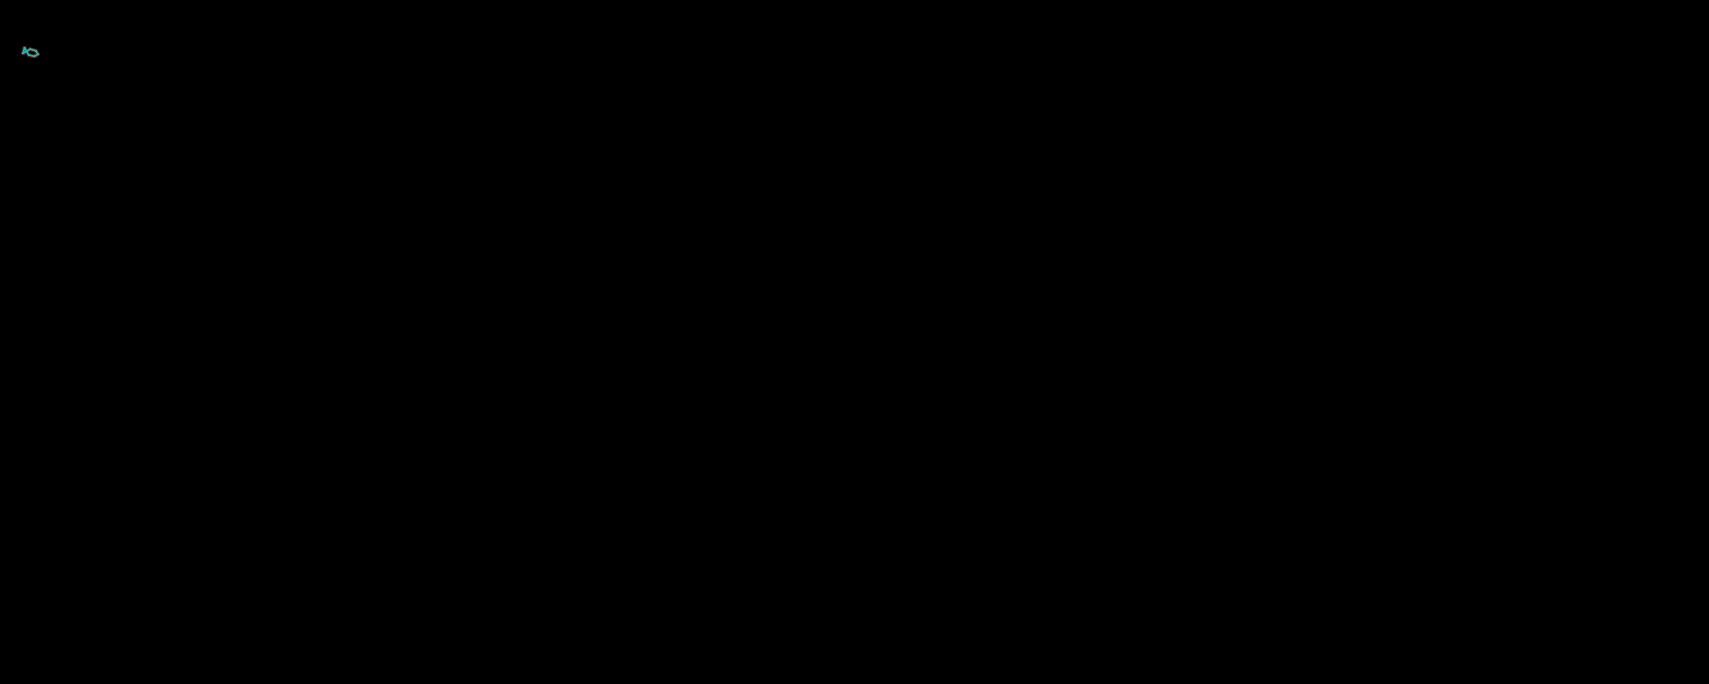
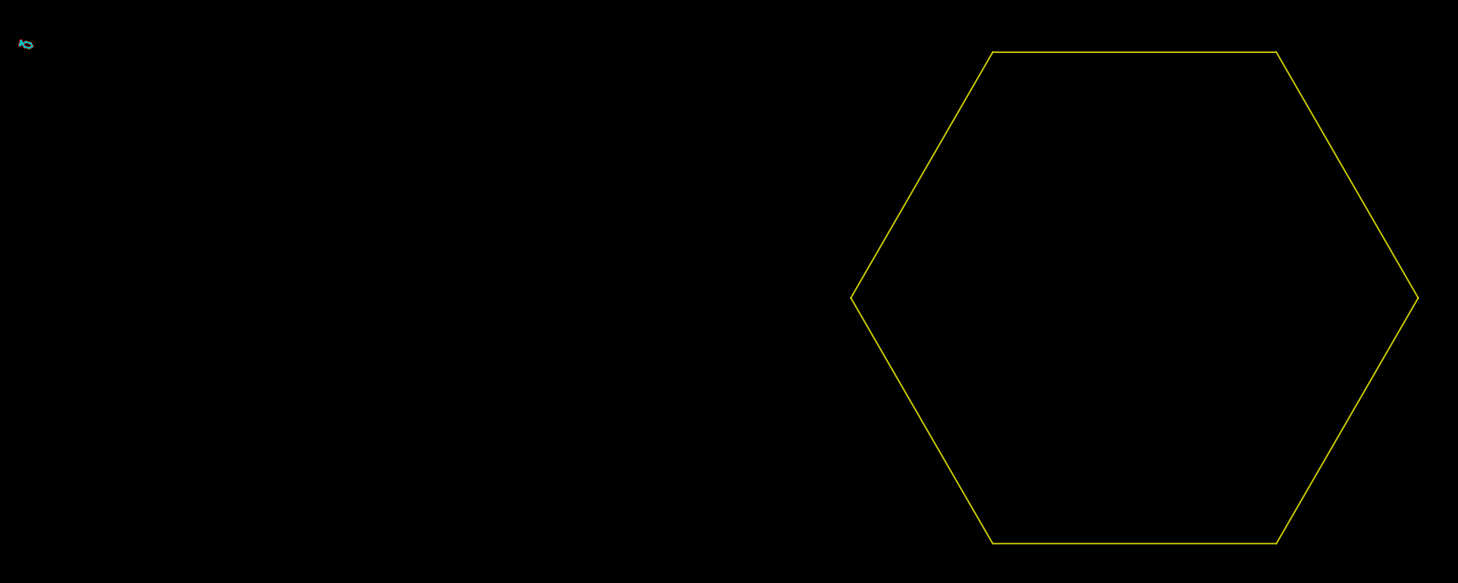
board edge: none -> (992, 52) (850, 297) (992, 543) (1276, 543) (1418, 297) (1276, 52) (992, 52)

